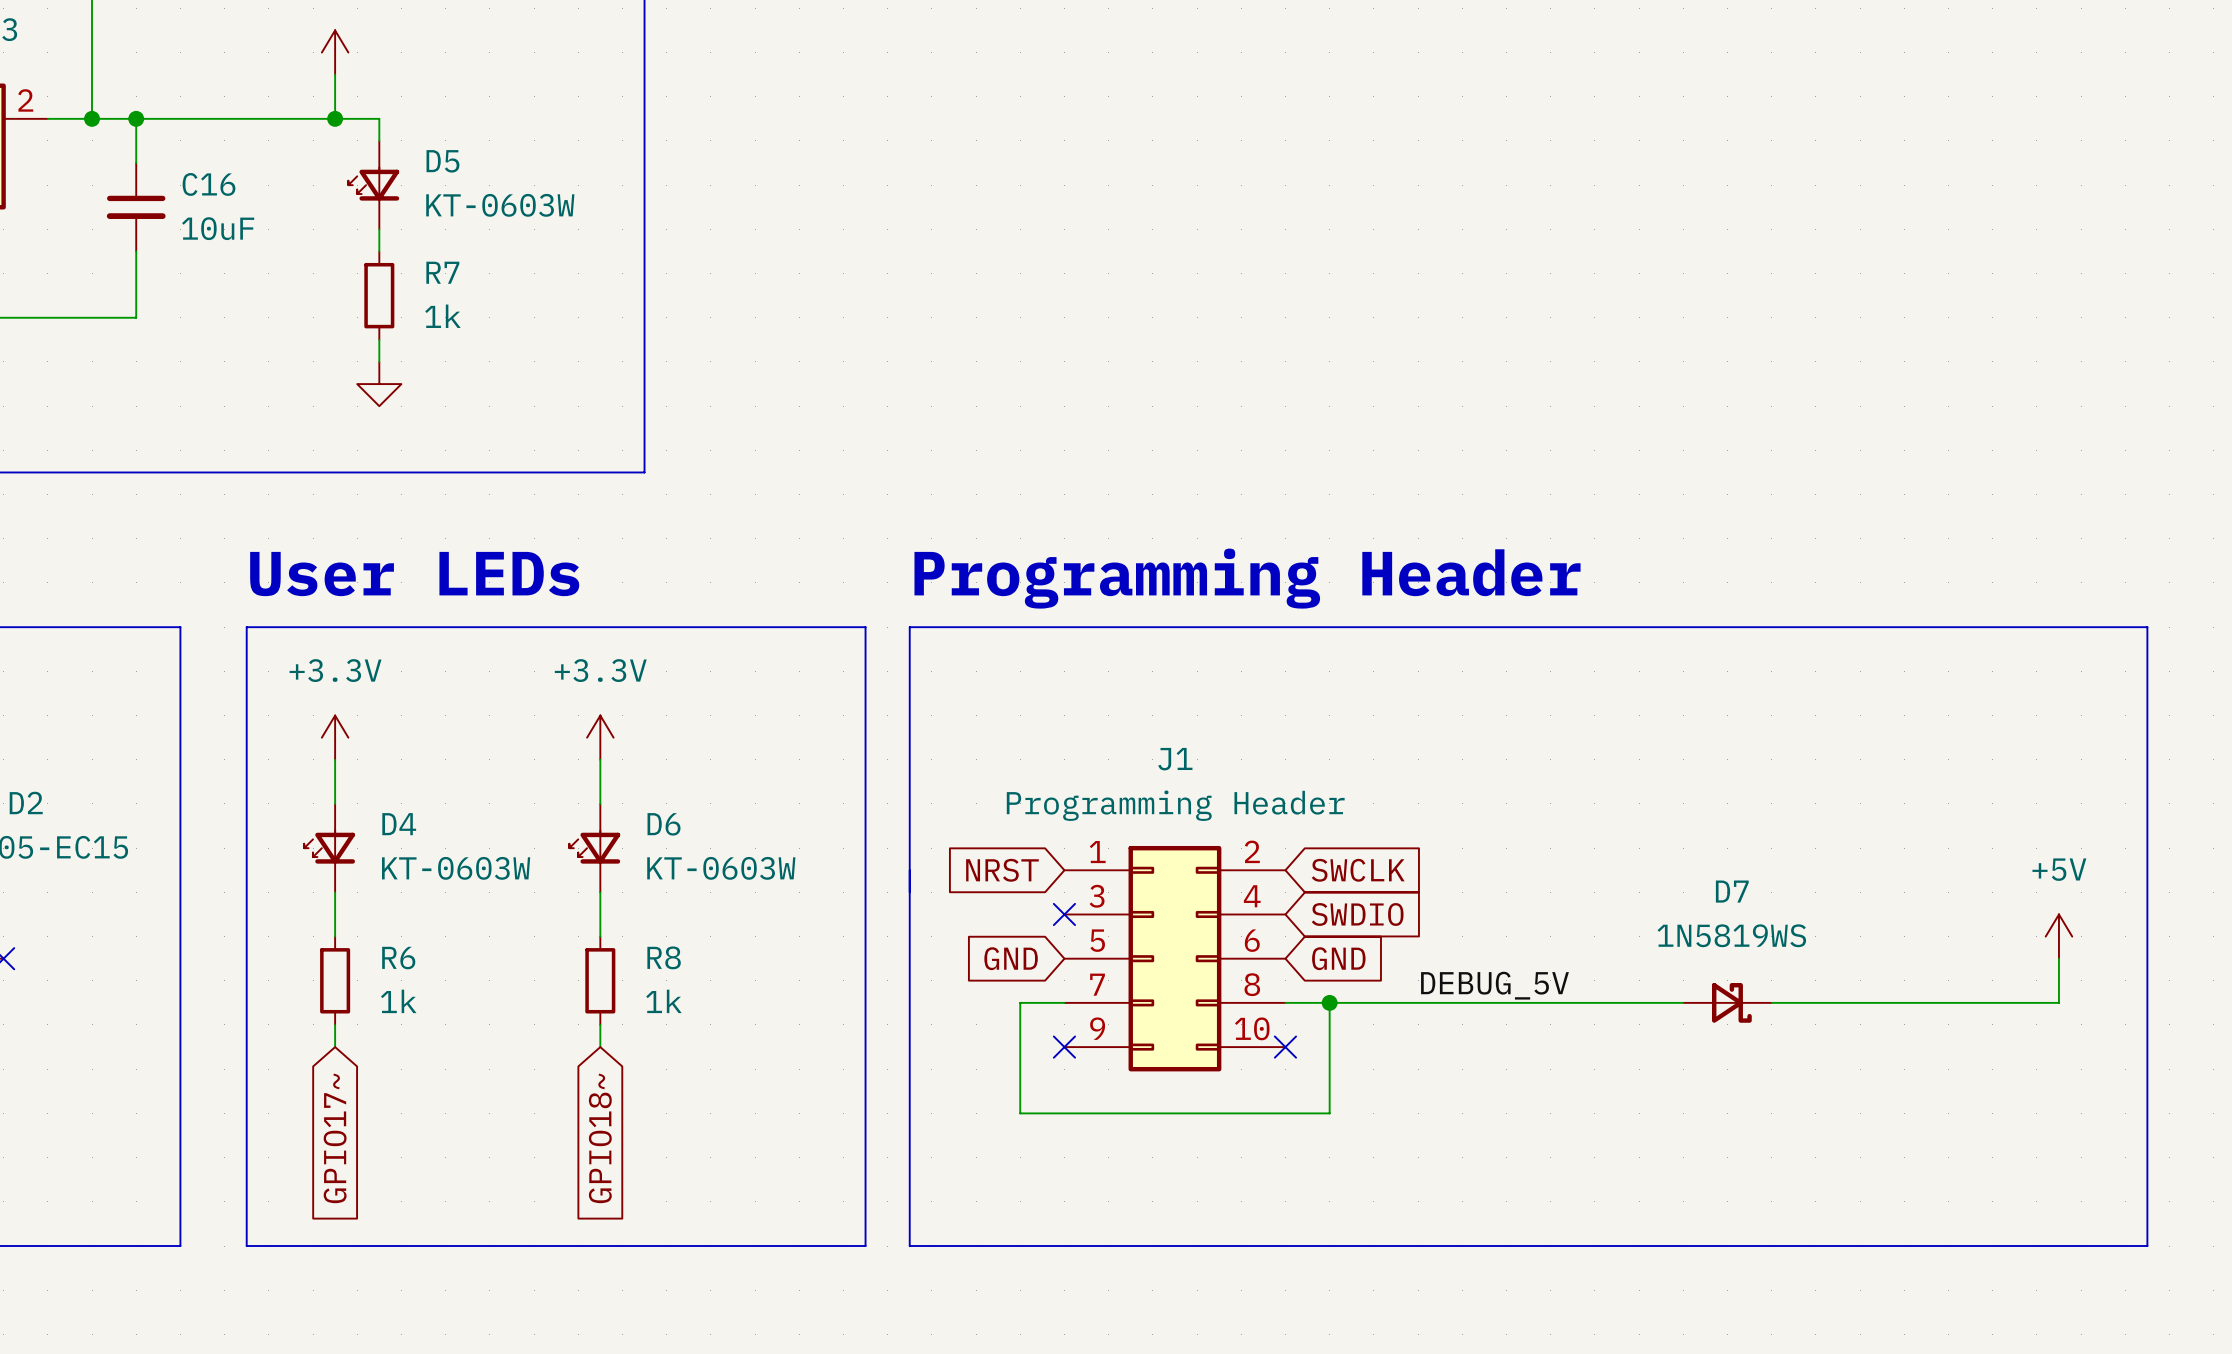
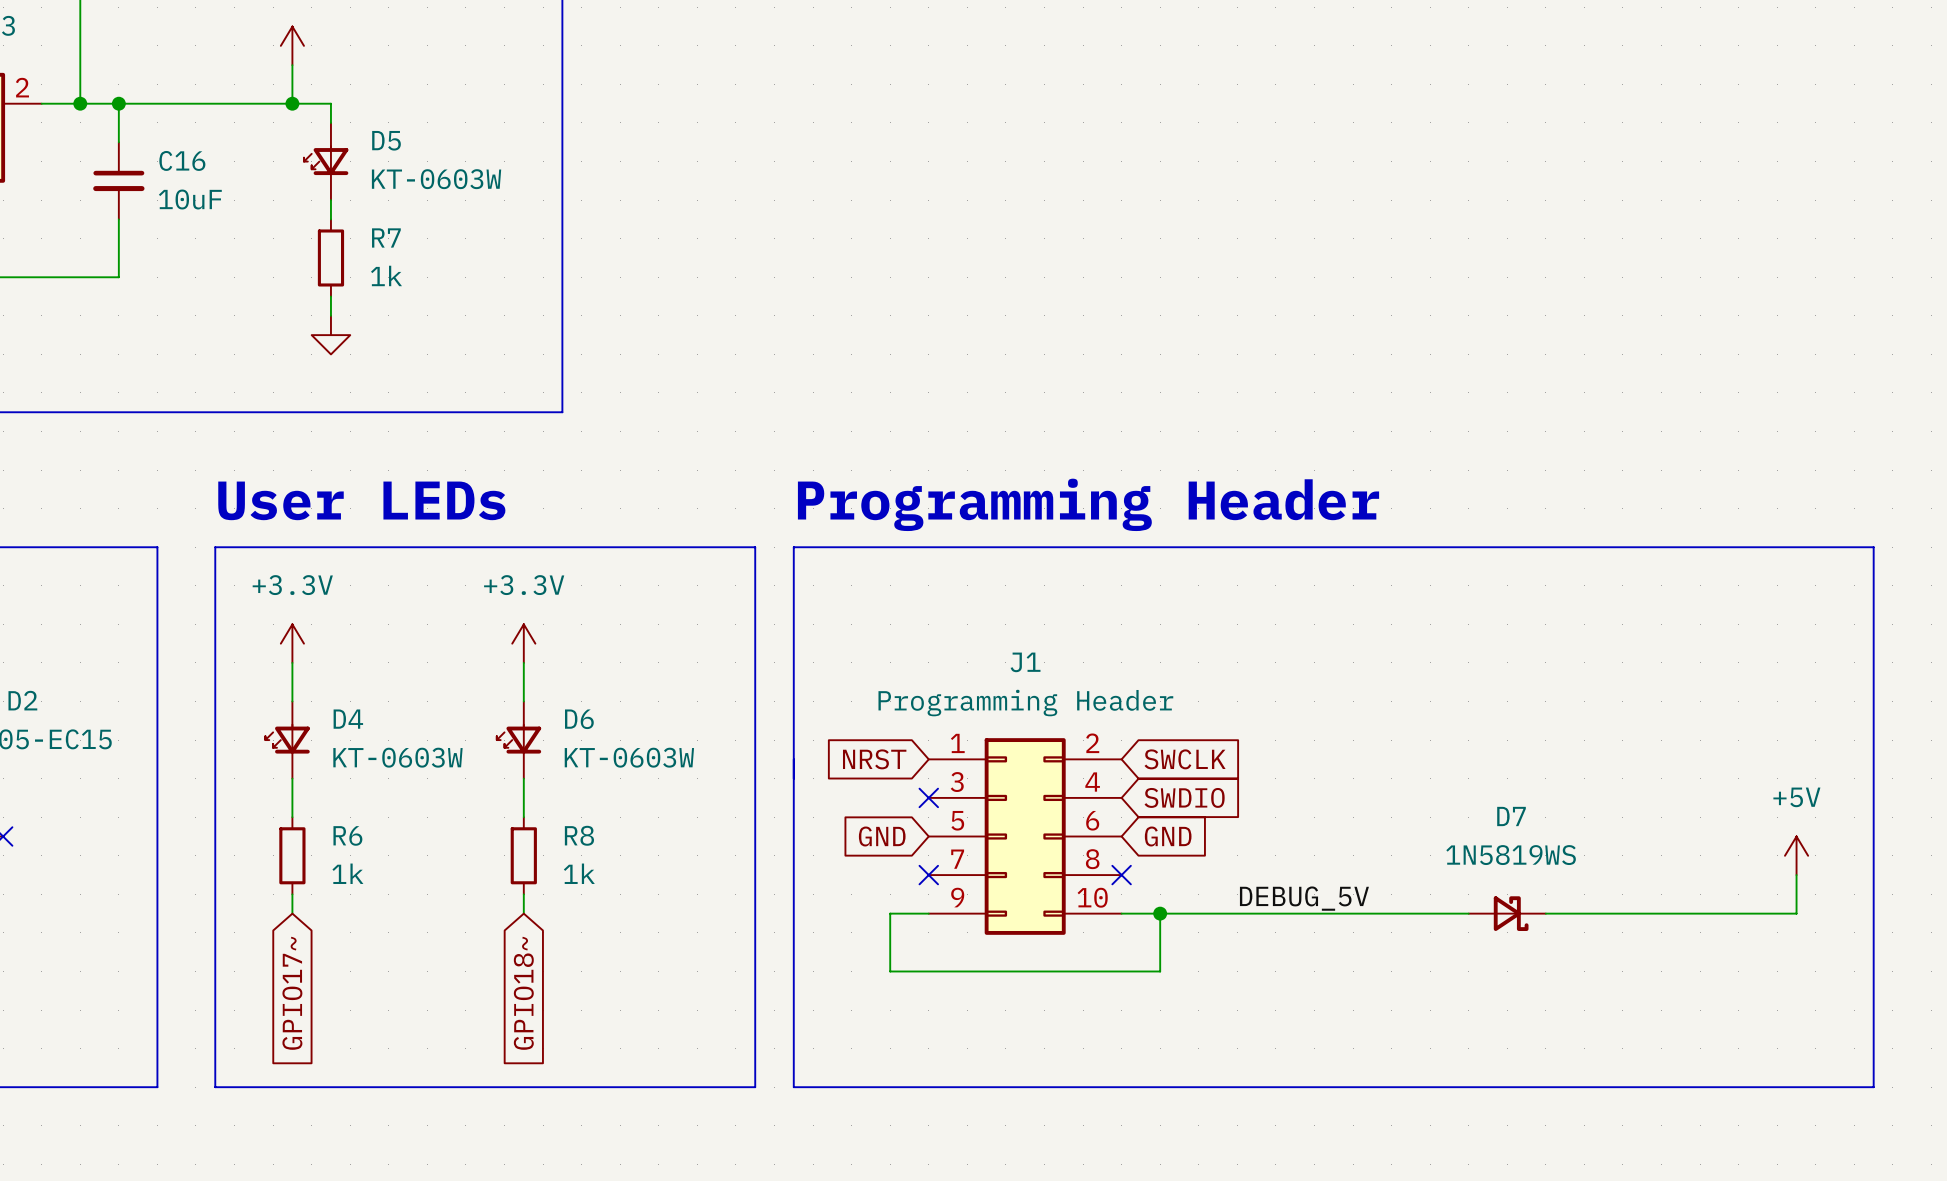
power symbol position: +5V (2058, 936) -> +5V (1796, 855)
wire: (2058, 958) (2058, 1002) (1771, 1002) -> (1796, 875) (1796, 913) (1545, 913)
label position: DEBUG_5V (1494, 985) -> DEBUG_5V (1304, 898)
wire: (1064, 1002) (1020, 1002) (1020, 1047) -> (928, 913) (890, 913)
wire: (1285, 1002) (1683, 1002) -> (1121, 913) (1468, 913)
wire: (1329, 1002) (1329, 1047) -> none
junction position: (1329, 1002) -> (1160, 913)
D7 position: (1727, 1002) -> (1507, 913)
no-connect mark position: (1064, 1047) -> (928, 875)
no-connect mark position: (1285, 1047) -> (1121, 875)

